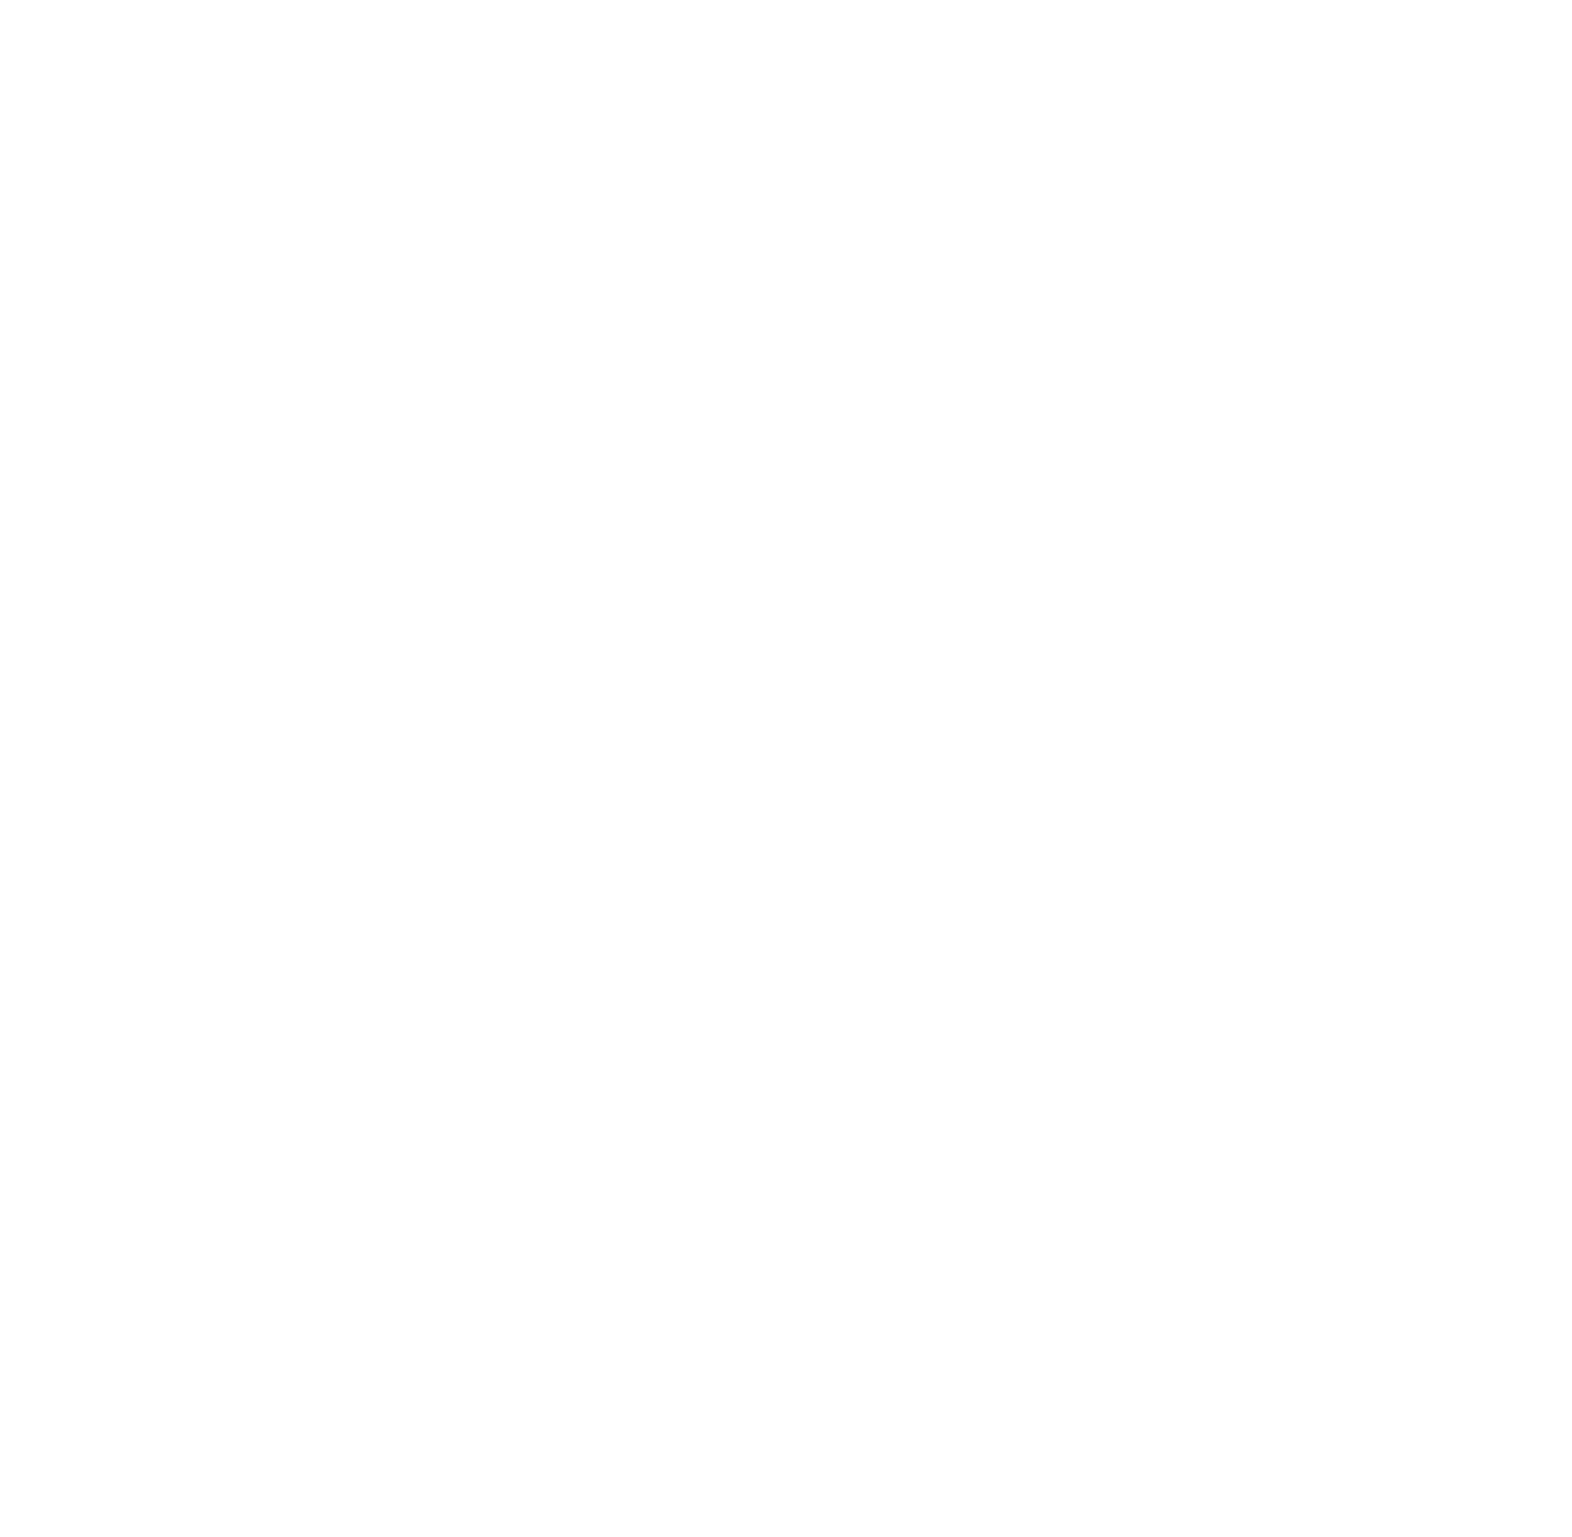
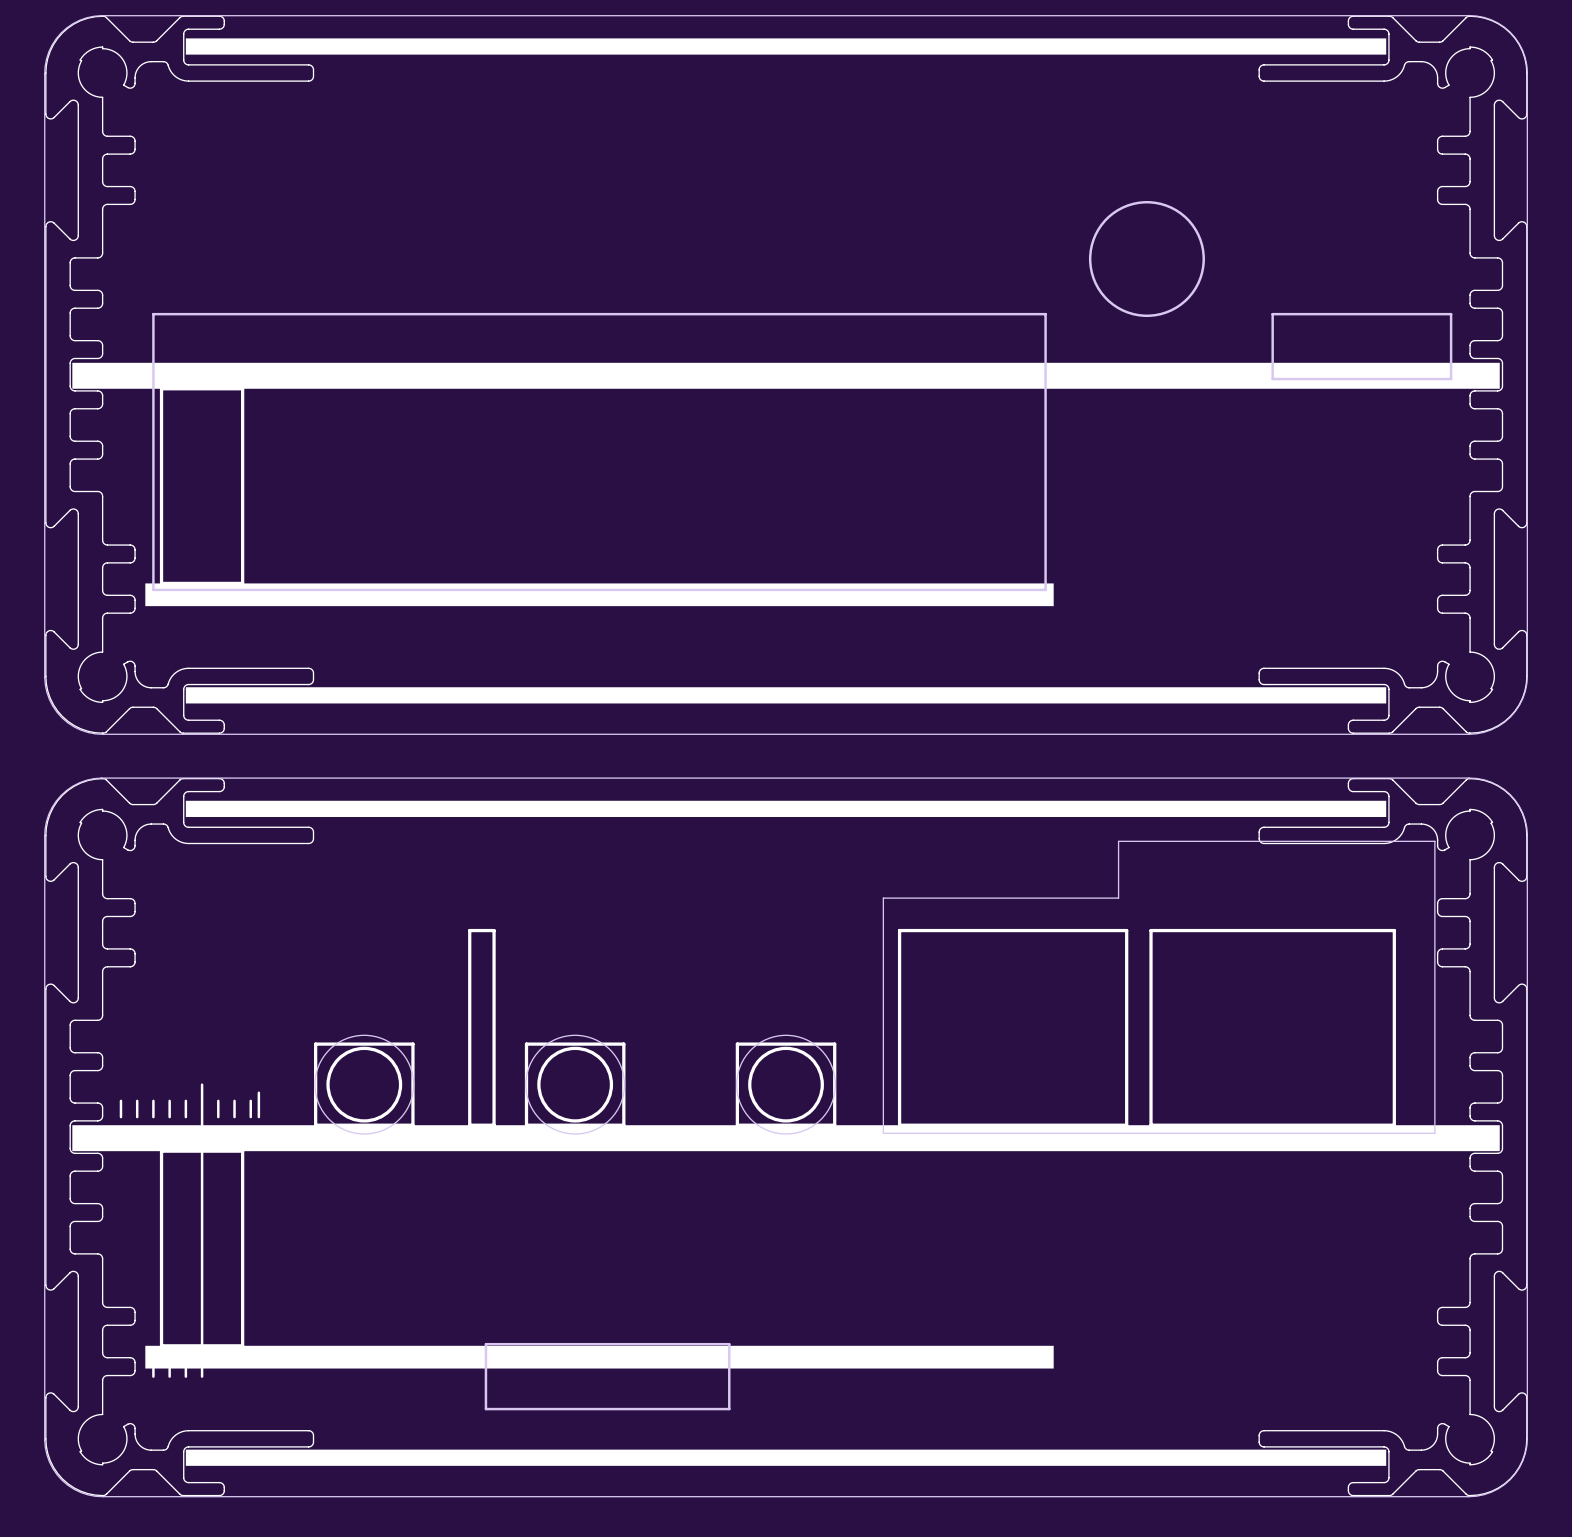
board edge: none -> (101, 15) (1468, 15) (1483, 17) (1497, 23) (1509, 31) (1519, 43) (1525, 57) (1527, 72) (1527, 675) (1522, 698) (1510, 717) (1498, 726) (1484, 732) (1468, 734) (103, 734) (88, 732) (74, 726) (62, 717) (52, 706) (46, 692) (44, 677) (44, 74) (48, 51) (61, 33) (79, 20) (101, 15)
line: none -> (102, 16) (133, 42) (155, 41) (182, 16) (220, 16) (224, 21) (223, 26) (221, 28) (188, 29) (184, 31) (183, 60) (185, 63) (308, 64) (313, 69) (313, 78) (309, 81) (188, 81) (175, 76) (165, 62) (149, 61) (138, 67) (135, 73) (134, 85) (129, 88) (123, 85) (126, 73) (123, 60) (114, 51) (102, 48) (102, 47) (92, 49) (84, 54) (80, 60) (81, 60) (78, 68) (79, 79) (83, 87) (91, 94) (102, 97) (103, 134) (106, 136) (131, 136) (135, 141) (134, 150) (132, 153) (106, 154) (102, 158) (103, 184) (106, 186) (132, 187) (135, 190) (134, 201) (130, 204) (104, 205) (101, 255) (98, 257) (73, 258) (70, 262) (71, 288) (99, 290) (102, 295) (102, 303) (100, 307) (74, 308) (70, 312) (71, 339) (99, 340) (102, 345) (102, 354) (100, 357) (74, 358) (70, 362) (71, 389) (99, 391) (102, 395) (102, 404) (100, 408) (74, 408) (70, 411) (71, 439) (74, 441) (99, 441) (102, 444) (102, 454) (99, 458) (71, 460) (70, 487) (74, 491) (101, 492) (103, 542) (106, 544) (131, 545) (135, 549) (134, 559) (132, 562) (106, 562) (102, 565) (103, 593) (106, 595) (132, 595) (135, 599) (135, 608) (130, 613) (106, 613) (103, 615) (102, 652) (91, 654) (81, 664) (78, 675) (80, 689) (86, 697) (95, 701) (102, 702) (102, 700) (113, 698) (124, 686) (126, 675) (123, 664) (129, 661) (134, 664) (135, 675) (138, 681) (145, 686) (151, 687) (166, 687) (173, 674) (186, 668) (308, 668) (312, 670) (313, 680) (309, 684) (185, 685) (183, 689) (184, 718) (188, 720) (221, 720) (223, 723) (224, 728) (220, 733) (181, 732) (153, 707) (130, 707) (104, 732) (87, 731) (74, 725) (62, 716) (50, 698) (46, 683) (46, 632) (53, 631) (71, 648) (75, 648) (78, 644) (78, 512) (75, 509) (70, 509) (51, 527) (47, 526) (45, 522) (45, 225) (48, 222) (52, 222) (70, 239) (75, 240) (77, 237) (78, 105) (75, 100) (71, 100) (53, 118) (46, 117) (46, 65) (50, 51) (62, 32) (80, 20) (102, 16)
line: none -> (1353, 16) (1391, 16) (1419, 42) (1442, 41) (1467, 16) (1484, 18) (1498, 23) (1510, 32) (1522, 51) (1526, 65) (1525, 117) (1519, 118) (1500, 100) (1496, 101) (1494, 105) (1494, 237) (1497, 240) (1501, 239) (1520, 221) (1524, 222) (1526, 226) (1526, 523) (1524, 527) (1520, 527) (1501, 509) (1497, 509) (1494, 512) (1494, 644) (1496, 648) (1500, 648) (1519, 631) (1525, 632) (1526, 683) (1522, 698) (1510, 716) (1491, 728) (1477, 732) (1466, 732) (1441, 707) (1419, 707) (1391, 732) (1352, 733) (1348, 728) (1348, 723) (1351, 720) (1384, 720) (1387, 718) (1388, 689) (1387, 685) (1264, 684) (1259, 680) (1259, 671) (1263, 668) (1384, 668) (1396, 672) (1407, 687) (1423, 687) (1434, 681) (1437, 675) (1437, 664) (1443, 661) (1448, 664) (1445, 676) (1448, 688) (1457, 697) (1470, 700) (1470, 702) (1479, 700) (1488, 694) (1492, 689) (1491, 688) (1494, 679) (1493, 670) (1487, 659) (1479, 653) (1470, 652) (1469, 615) (1465, 613) (1441, 612) (1437, 608) (1437, 598) (1440, 595) (1465, 595) (1470, 590) (1469, 564) (1465, 562) (1440, 562) (1437, 558) (1438, 547) (1441, 545) (1468, 543) (1470, 493) (1474, 491) (1498, 491) (1502, 487) (1501, 460) (1473, 458) (1470, 454) (1470, 444) (1472, 441) (1498, 441) (1502, 436) (1501, 410) (1473, 408) (1470, 403) (1470, 394) (1472, 391) (1498, 390) (1502, 387) (1501, 359) (1473, 358) (1470, 353) (1470, 344) (1472, 341) (1498, 340) (1502, 337) (1501, 310) (1498, 308) (1473, 307) (1470, 304) (1470, 295) (1473, 290) (1501, 288) (1502, 261) (1498, 257) (1471, 256) (1469, 206) (1465, 204) (1441, 204) (1437, 199) (1437, 190) (1440, 187) (1465, 186) (1469, 183) (1469, 156) (1465, 154) (1440, 153) (1437, 150) (1437, 140) (1441, 136) (1465, 136) (1469, 134) (1470, 97) (1483, 93) (1491, 85) (1494, 74) (1492, 60) (1485, 52) (1476, 47) (1470, 47) (1470, 48) (1459, 51) (1447, 63) (1445, 74) (1448, 85) (1442, 88) (1437, 84) (1437, 73) (1434, 67) (1427, 62) (1421, 61) (1406, 62) (1398, 75) (1386, 80) (1264, 81) (1260, 79) (1259, 68) (1263, 64) (1387, 63) (1388, 60) (1387, 31) (1384, 29) (1351, 28) (1348, 26) (1348, 20) (1353, 16)
drawing: none -> [185, 38, 1387, 55]
round board edge: none -> [1088, 200, 1205, 318]
board edge: none -> (153, 314) (1045, 314) (1045, 589) (153, 589) (153, 314)
board edge: none -> (1272, 314) (1451, 314) (1451, 379) (1272, 379) (1272, 314)
drawing: none -> [72, 362, 1500, 389]
line: none -> (161, 388) (161, 583) (242, 583) (242, 388) (161, 388)
drawing: none -> [145, 583, 1054, 607]
drawing: none -> [185, 687, 1387, 704]
board edge: none -> (101, 778) (1468, 778) (1483, 779) (1497, 785) (1509, 794) (1519, 806) (1525, 819) (1527, 834) (1527, 1438) (1522, 1460) (1510, 1479) (1498, 1488) (1484, 1494) (1468, 1496) (103, 1496) (88, 1494) (74, 1489) (62, 1480) (52, 1468) (46, 1454) (44, 1439) (44, 836) (48, 814) (61, 795) (79, 782) (101, 778)
line: none -> (102, 778) (133, 804) (155, 803) (182, 778) (220, 778) (224, 783) (223, 788) (221, 791) (188, 791) (184, 793) (183, 822) (185, 826) (308, 827) (313, 831) (313, 840) (309, 843) (188, 843) (175, 839) (165, 824) (149, 824) (138, 830) (135, 836) (134, 847) (129, 850) (123, 847) (126, 835) (123, 823) (114, 814) (102, 811) (102, 809) (92, 811) (84, 817) (80, 822) (81, 823) (78, 831) (79, 842) (83, 849) (91, 857) (102, 859) (103, 896) (106, 898) (131, 898) (135, 903) (134, 912) (132, 915) (106, 916) (102, 921) (103, 947) (106, 948) (132, 949) (135, 953) (134, 964) (130, 966) (104, 968) (101, 1017) (98, 1020) (73, 1020) (70, 1024) (71, 1051) (99, 1052) (102, 1057) (102, 1066) (100, 1069) (74, 1070) (70, 1074) (71, 1101) (99, 1103) (102, 1107) (102, 1116) (100, 1120) (74, 1120) (70, 1124) (71, 1151) (99, 1153) (102, 1158) (102, 1166) (100, 1170) (74, 1171) (70, 1174) (71, 1201) (74, 1203) (99, 1203) (102, 1207) (102, 1216) (99, 1221) (71, 1222) (70, 1250) (74, 1253) (101, 1255) (103, 1304) (106, 1307) (131, 1307) (135, 1312) (134, 1321) (132, 1324) (106, 1325) (102, 1328) (103, 1355) (106, 1357) (132, 1358) (135, 1361) (135, 1371) (130, 1375) (106, 1375) (103, 1377) (102, 1414) (91, 1417) (81, 1426) (78, 1437) (80, 1451) (86, 1459) (95, 1463) (102, 1464) (102, 1463) (113, 1460) (124, 1448) (126, 1437) (123, 1426) (129, 1423) (134, 1426) (135, 1438) (138, 1443) (145, 1448) (151, 1450) (166, 1449) (173, 1436) (186, 1430) (308, 1430) (312, 1432) (313, 1443) (309, 1446) (185, 1447) (183, 1451) (184, 1480) (188, 1482) (221, 1482) (223, 1485) (224, 1491) (220, 1495) (181, 1495) (153, 1469) (130, 1470) (104, 1495) (87, 1493) (74, 1487) (62, 1478) (50, 1460) (46, 1446) (46, 1394) (53, 1393) (71, 1411) (75, 1410) (78, 1406) (78, 1274) (75, 1271) (70, 1272) (51, 1289) (47, 1289) (45, 1285) (45, 988) (48, 984) (52, 984) (70, 1002) (75, 1002) (77, 999) (78, 867) (75, 863) (71, 862) (53, 880) (46, 879) (46, 827) (50, 813) (62, 795) (80, 782) (102, 778)
line: none -> (1353, 778) (1391, 778) (1419, 804) (1442, 803) (1467, 778) (1484, 780) (1498, 786) (1510, 795) (1522, 813) (1526, 827) (1525, 879) (1519, 880) (1500, 862) (1496, 863) (1494, 867) (1494, 999) (1497, 1002) (1501, 1002) (1520, 984) (1524, 985) (1526, 989) (1526, 1285) (1524, 1289) (1520, 1289) (1501, 1272) (1497, 1271) (1494, 1274) (1494, 1406) (1496, 1410) (1500, 1411) (1519, 1393) (1525, 1394) (1526, 1446) (1522, 1460) (1510, 1478) (1491, 1491) (1477, 1495) (1466, 1494) (1441, 1470) (1419, 1469) (1391, 1495) (1352, 1495) (1348, 1490) (1348, 1485) (1351, 1482) (1384, 1482) (1387, 1480) (1388, 1451) (1387, 1447) (1264, 1446) (1259, 1442) (1259, 1433) (1263, 1430) (1384, 1430) (1396, 1435) (1407, 1449) (1423, 1450) (1434, 1443) (1437, 1438) (1437, 1426) (1443, 1423) (1448, 1426) (1445, 1438) (1448, 1450) (1457, 1459) (1470, 1463) (1470, 1464) (1479, 1462) (1488, 1457) (1492, 1451) (1491, 1450) (1494, 1441) (1493, 1432) (1487, 1421) (1479, 1416) (1470, 1414) (1469, 1377) (1465, 1375) (1441, 1375) (1437, 1370) (1437, 1361) (1440, 1358) (1465, 1357) (1470, 1352) (1469, 1327) (1465, 1325) (1440, 1324) (1437, 1321) (1438, 1309) (1441, 1307) (1468, 1305) (1470, 1256) (1474, 1253) (1498, 1253) (1502, 1249) (1501, 1222) (1473, 1221) (1470, 1216) (1470, 1207) (1472, 1204) (1498, 1203) (1502, 1199) (1501, 1172) (1473, 1171) (1470, 1166) (1470, 1156) (1472, 1153) (1498, 1153) (1502, 1149) (1501, 1122) (1473, 1120) (1470, 1116) (1470, 1106) (1472, 1103) (1498, 1102) (1502, 1100) (1501, 1072) (1498, 1070) (1473, 1070) (1470, 1066) (1470, 1057) (1473, 1052) (1501, 1051) (1502, 1023) (1498, 1020) (1471, 1018) (1469, 969) (1465, 966) (1441, 966) (1437, 961) (1437, 952) (1440, 949) (1465, 948) (1469, 945) (1469, 918) (1465, 916) (1440, 916) (1437, 912) (1437, 902) (1441, 898) (1465, 898) (1469, 896) (1470, 859) (1483, 855) (1491, 847) (1494, 836) (1492, 822) (1485, 814) (1476, 810) (1470, 809) (1470, 811) (1459, 813) (1447, 825) (1445, 836) (1448, 847) (1442, 850) (1437, 847) (1437, 836) (1434, 830) (1427, 825) (1421, 824) (1406, 824) (1398, 837) (1386, 843) (1264, 843) (1260, 841) (1259, 830) (1263, 827) (1387, 826) (1388, 822) (1387, 793) (1384, 791) (1351, 791) (1348, 788) (1348, 782) (1353, 778)
drawing: none -> [185, 800, 1387, 818]
board edge: none -> (1118, 841) (1118, 898) (883, 898) (883, 1133) (1434, 1133) (1434, 841) (1118, 841)
line: none -> (469, 930) (494, 930) (494, 1125) (469, 1125) (469, 930)
line: none -> (899, 930) (1126, 930) (1126, 1125) (899, 1125) (899, 930)
line: none -> (1151, 930) (1394, 930) (1394, 1125) (1151, 1125) (1151, 930)
round board edge: none -> [314, 1034, 415, 1135]
round board edge: none -> [525, 1034, 626, 1135]
round board edge: none -> [736, 1034, 836, 1135]
line: none -> (315, 1044) (315, 1125) (412, 1125) (412, 1044) (315, 1044)
line: none -> (526, 1044) (623, 1044) (623, 1125) (526, 1125) (526, 1044)
line: none -> (737, 1044) (834, 1044) (834, 1125) (737, 1125) (737, 1044)
drawing: none -> [72, 1046, 1500, 1152]
line: none -> (202, 1084) (202, 1360)
line: none -> (258, 1092) (258, 1117)
line: none -> (120, 1100) (120, 1117)
line: none -> (137, 1100) (137, 1117)
line: none -> (153, 1100) (153, 1117)
line: none -> (169, 1100) (169, 1117)
line: none -> (185, 1100) (185, 1117)
line: none -> (218, 1100) (218, 1117)
line: none -> (234, 1100) (234, 1117)
line: none -> (250, 1100) (250, 1117)
line: none -> (161, 1151) (161, 1345) (242, 1345) (242, 1151) (161, 1151)
board edge: none -> (485, 1344) (729, 1344) (729, 1409) (485, 1409) (485, 1344)
drawing: none -> [145, 1345, 1054, 1369]
line: none -> (153, 1368) (153, 1376)
line: none -> (169, 1368) (169, 1376)
line: none -> (185, 1368) (185, 1376)
line: none -> (202, 1368) (202, 1376)
drawing: none -> [185, 1449, 1387, 1466]

